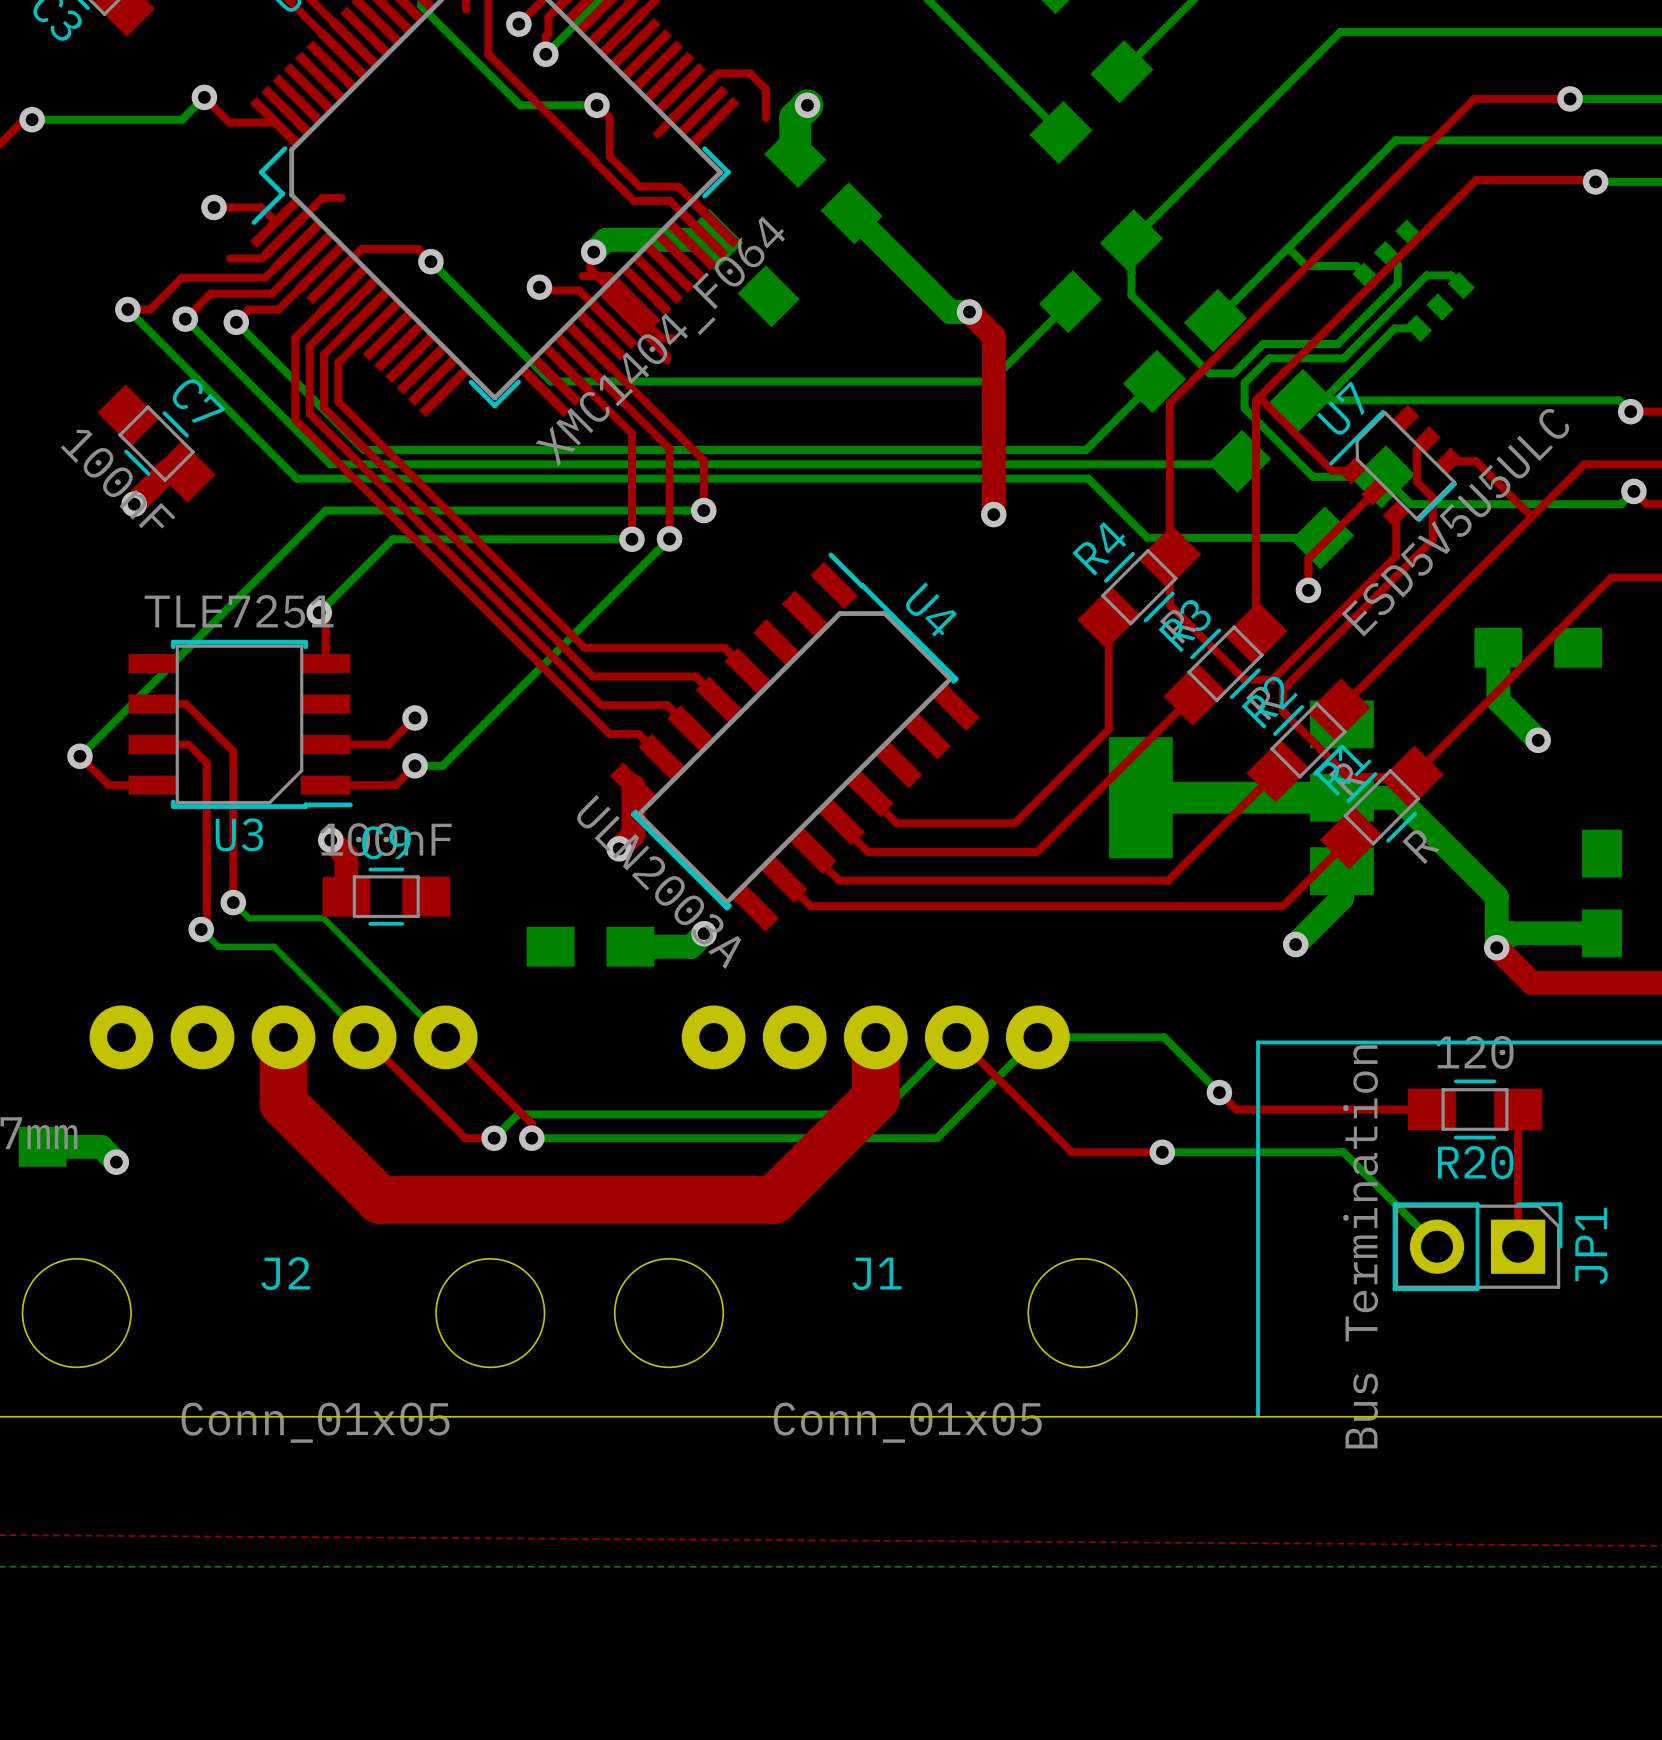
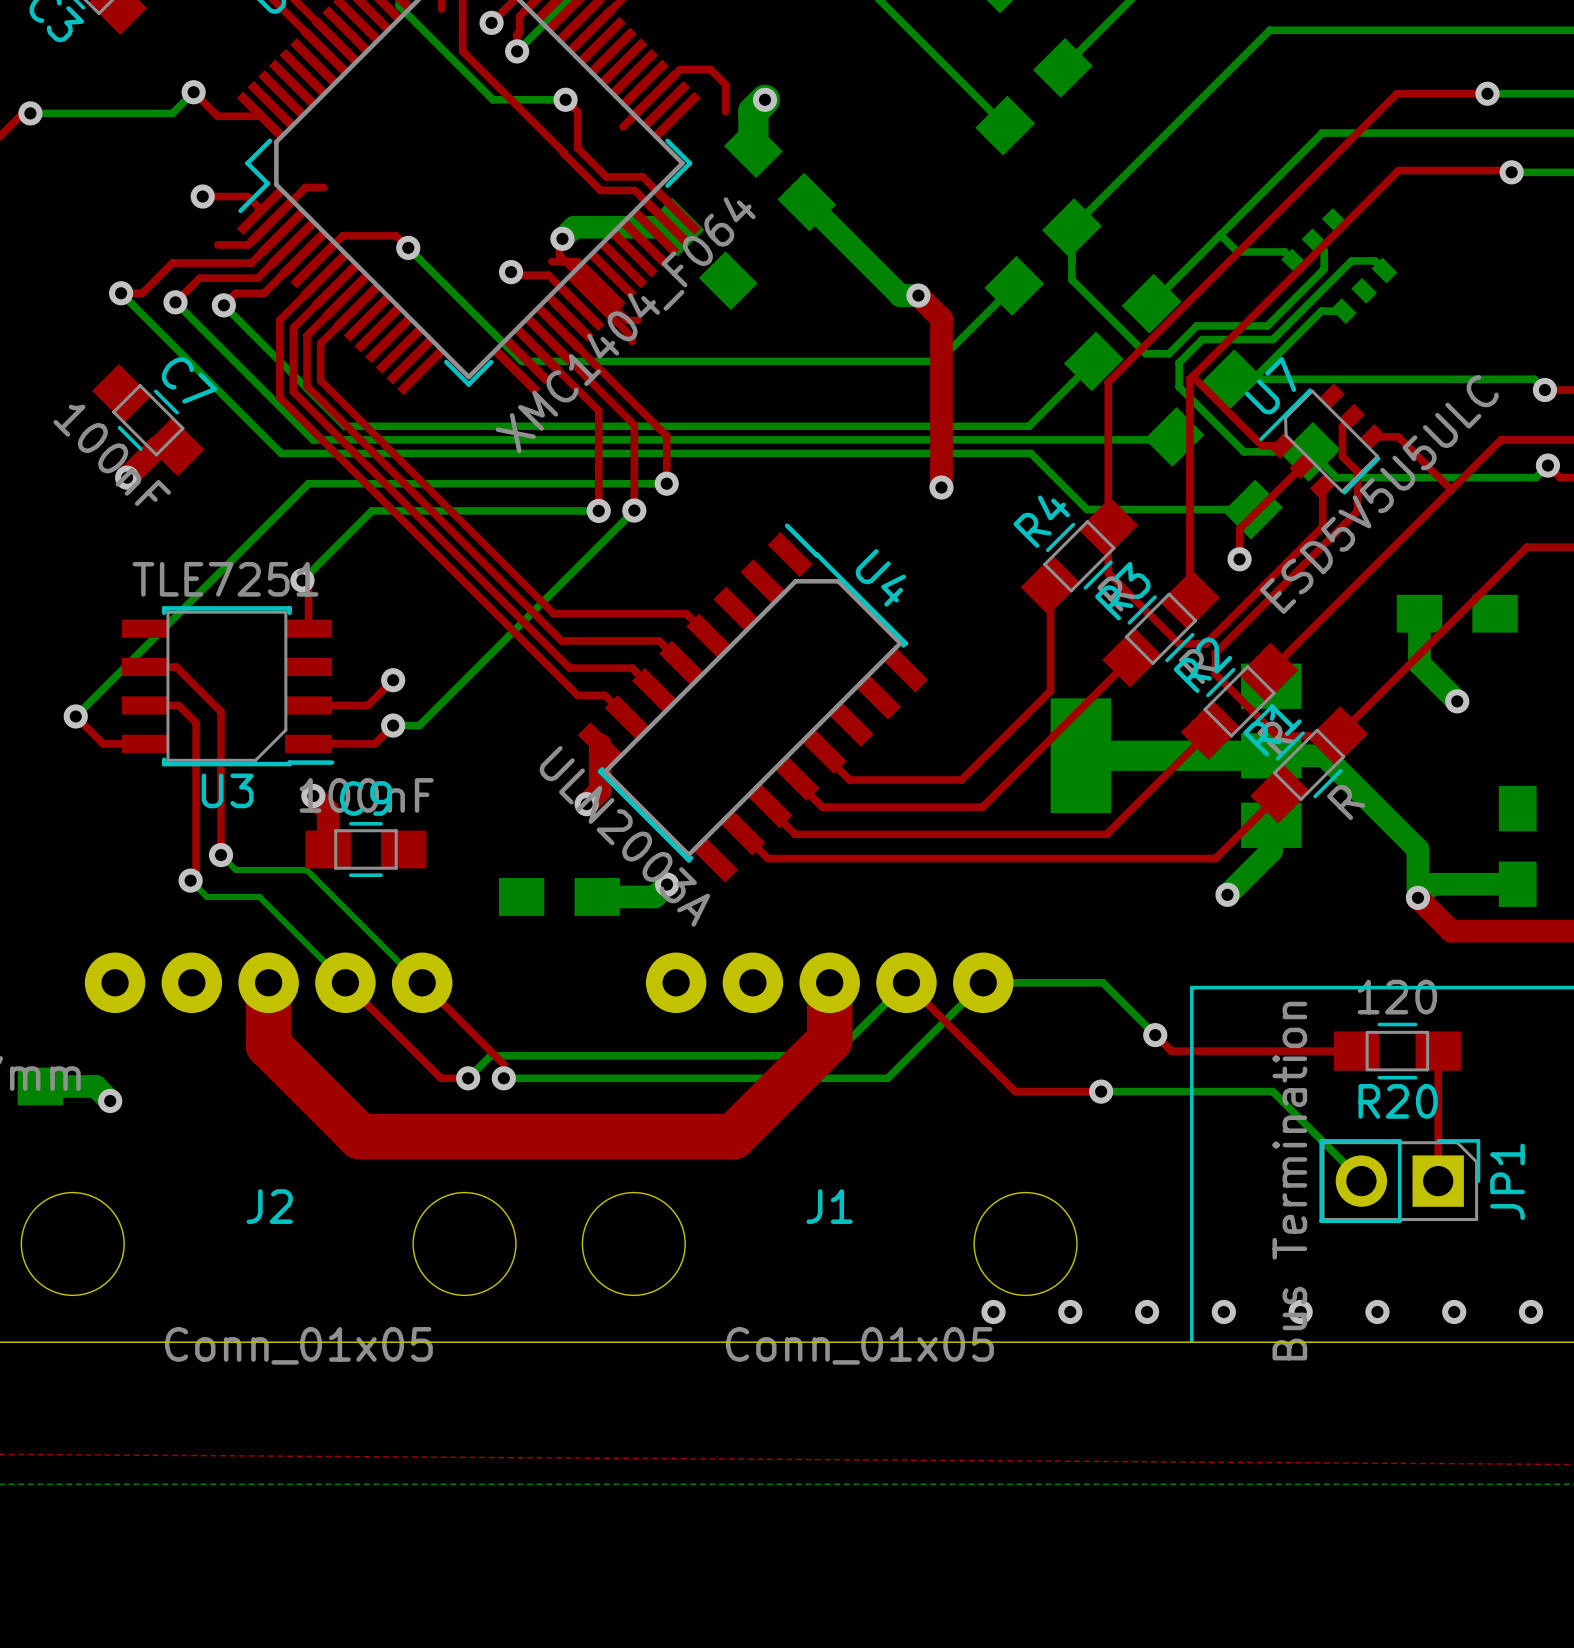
via: none -> (993, 1311)
via: none -> (1070, 1311)
via: none -> (1147, 1311)
via: none -> (1223, 1311)
via: none -> (1300, 1311)
via: none -> (1377, 1311)
via: none -> (1454, 1311)
via: none -> (1531, 1311)

